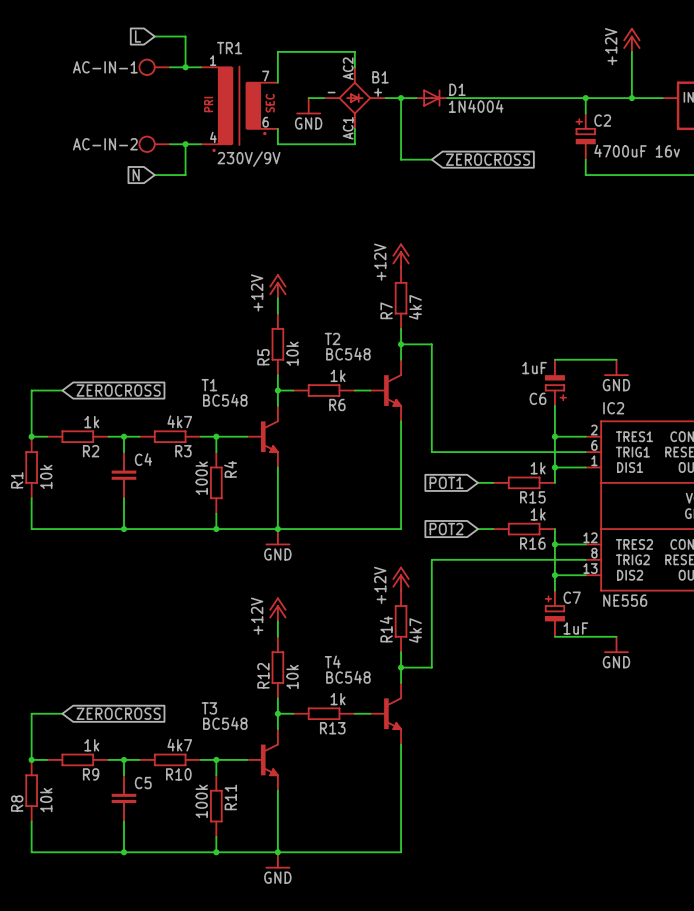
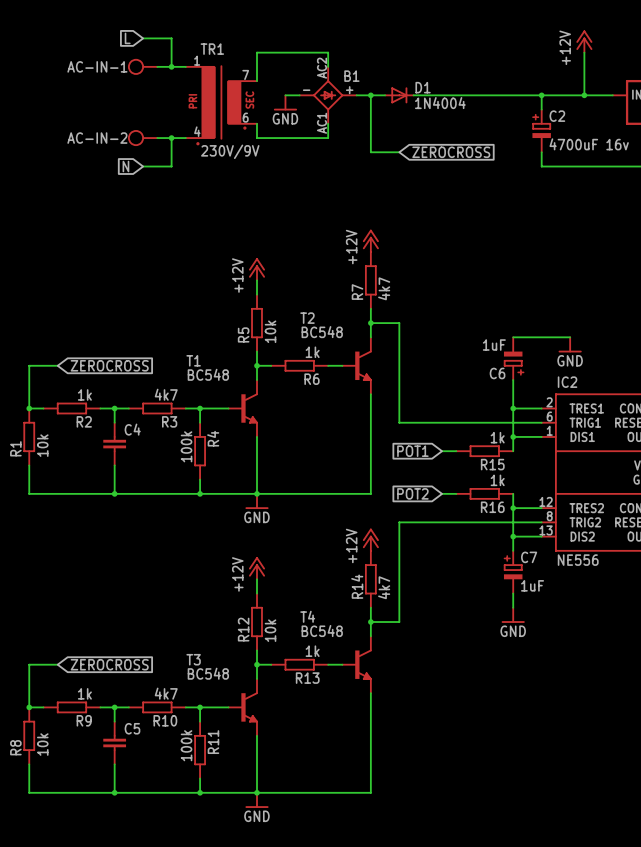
wire: (554, 636) (616, 636) -> (513, 593) (513, 607)
power symbol position: GND (616, 644) -> GND (513, 615)

